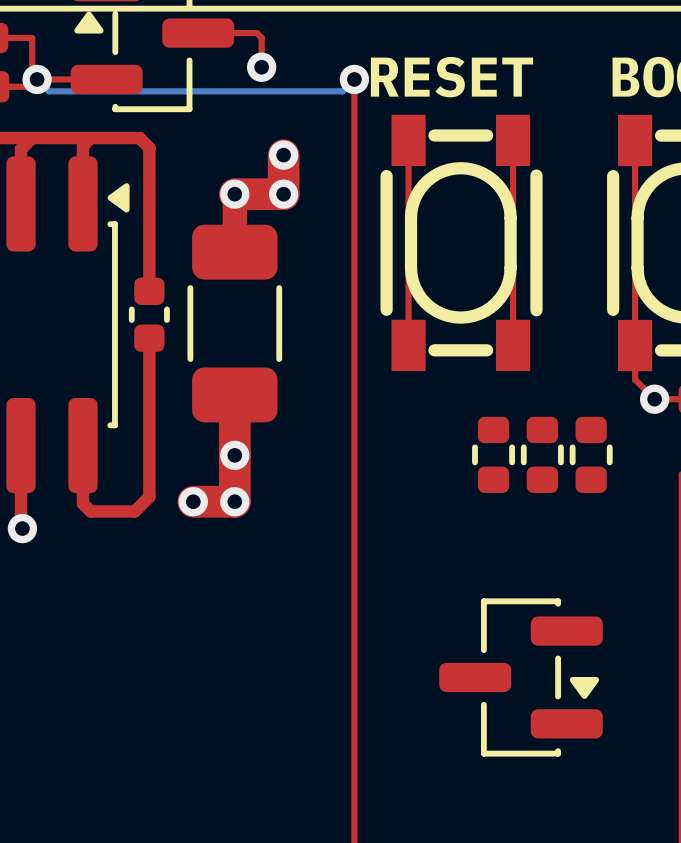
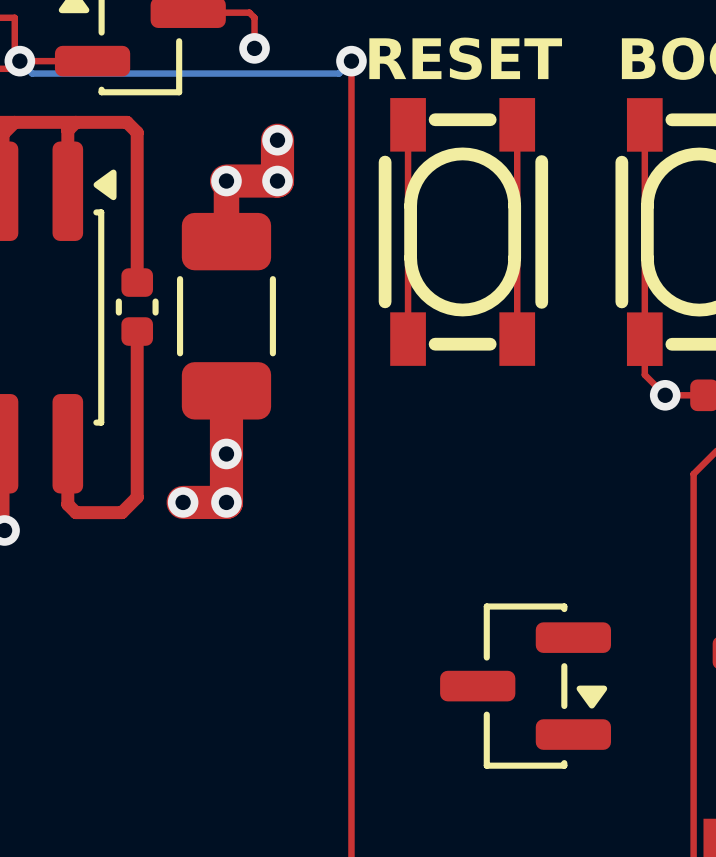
part: (493, 454) -> none
part: (542, 454) -> none
part: (591, 454) -> none

